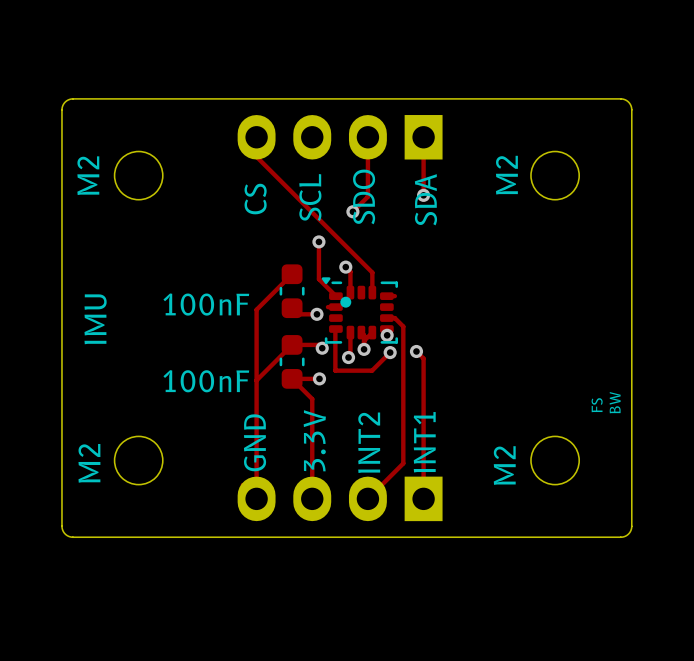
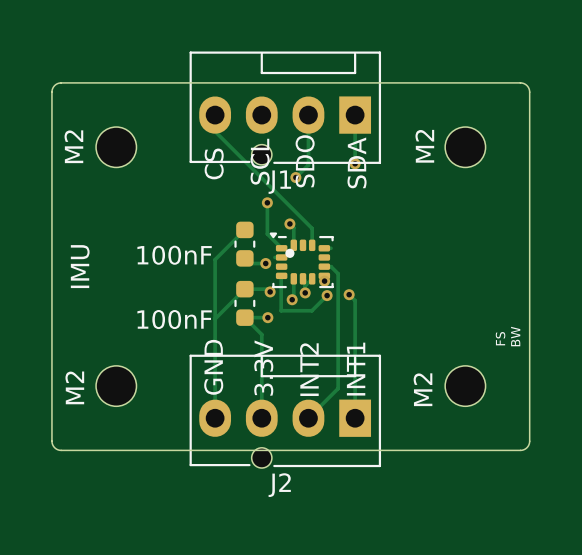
J1: none -> (285, 108)
J2: none -> (285, 411)

